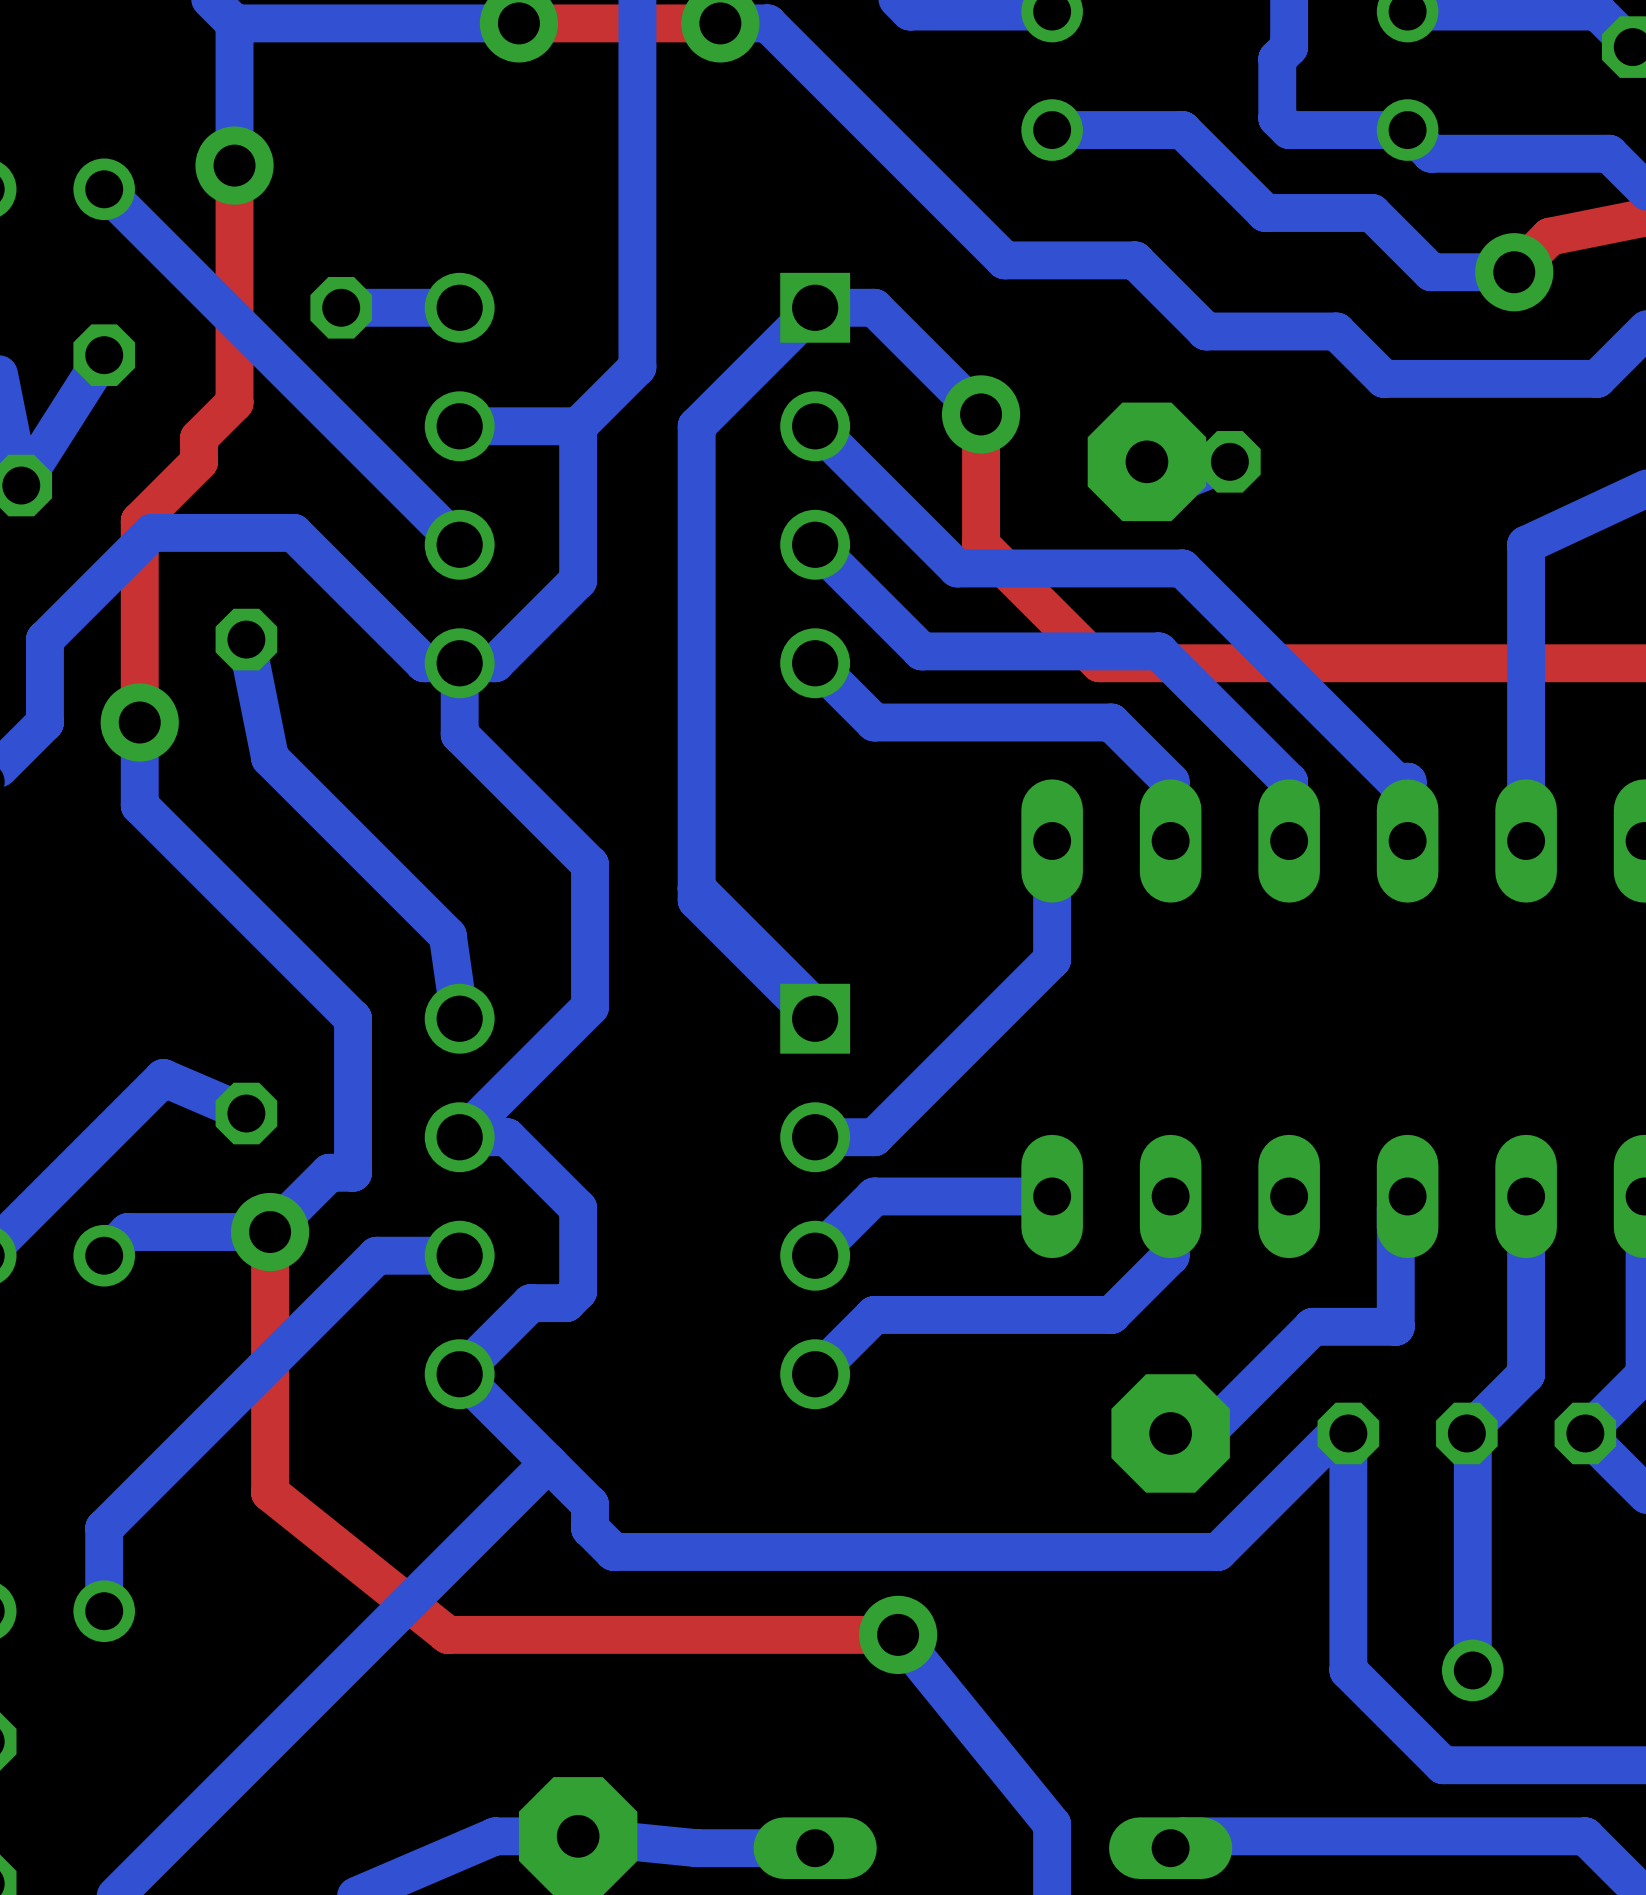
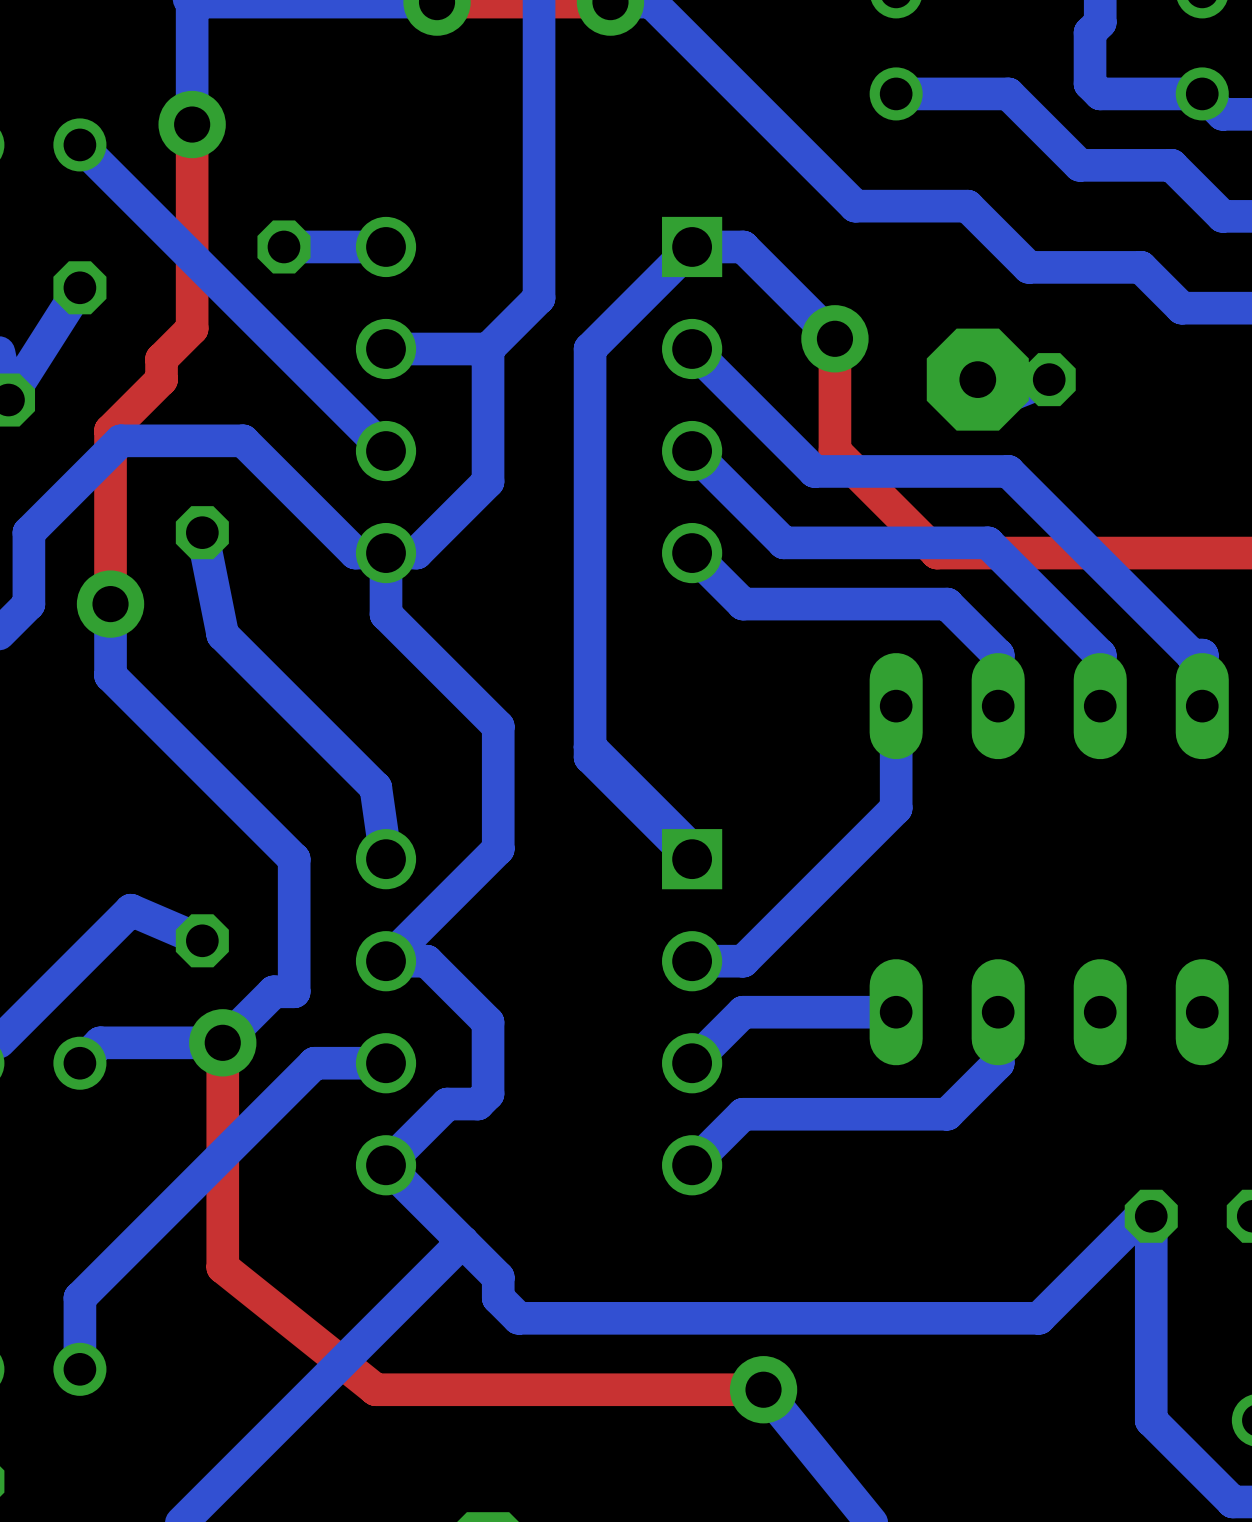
bottom track: (1407, 1196) (1395, 1208) (1395, 1326) (1312, 1326) (1206, 1433) (1170, 1433) -> none
part: (1170, 1433) -> none

